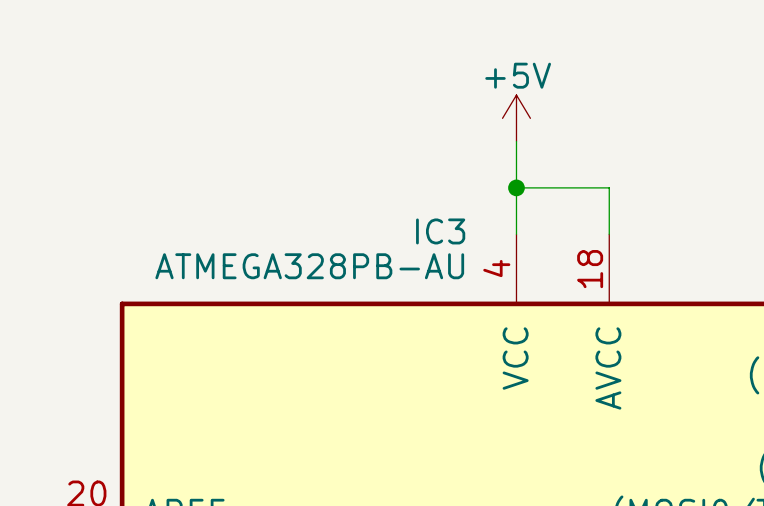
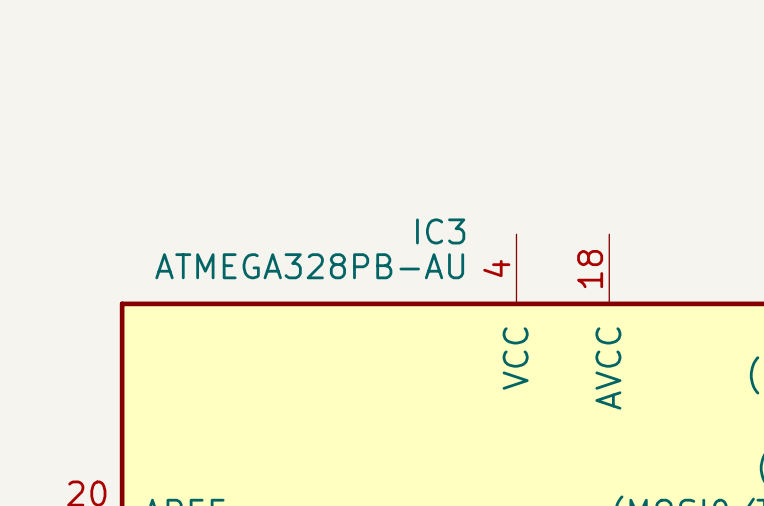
power symbol: +5V (516, 118) -> none
wire: (516, 141) (516, 234) -> none
wire: (516, 187) (609, 187) (609, 234) -> none
junction: (516, 187) -> none

